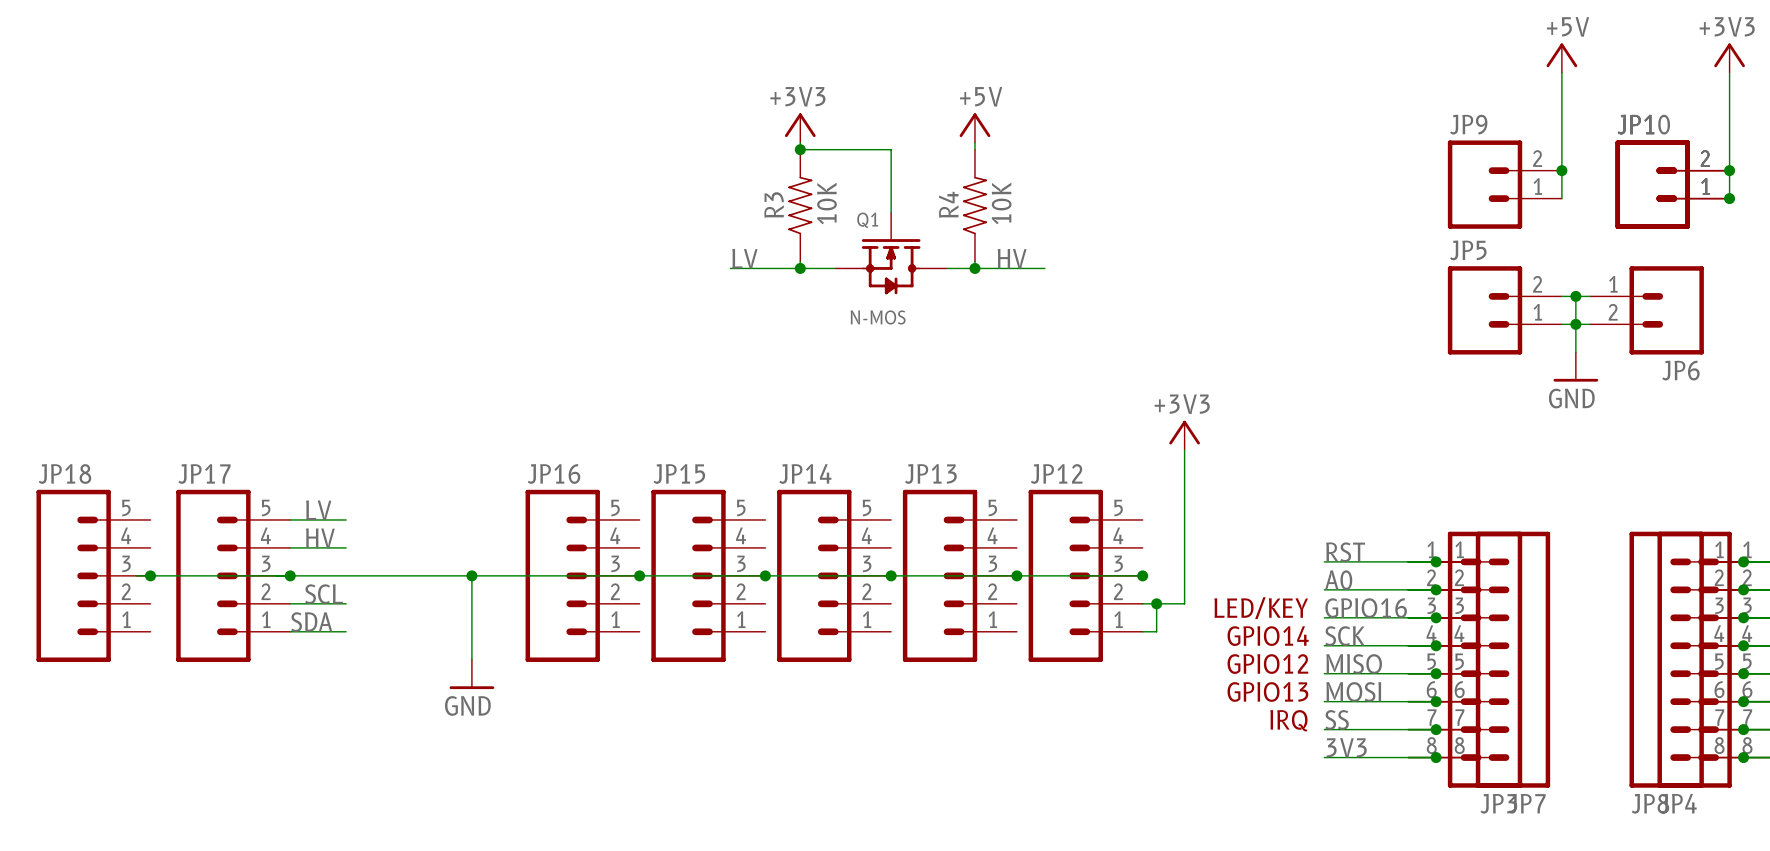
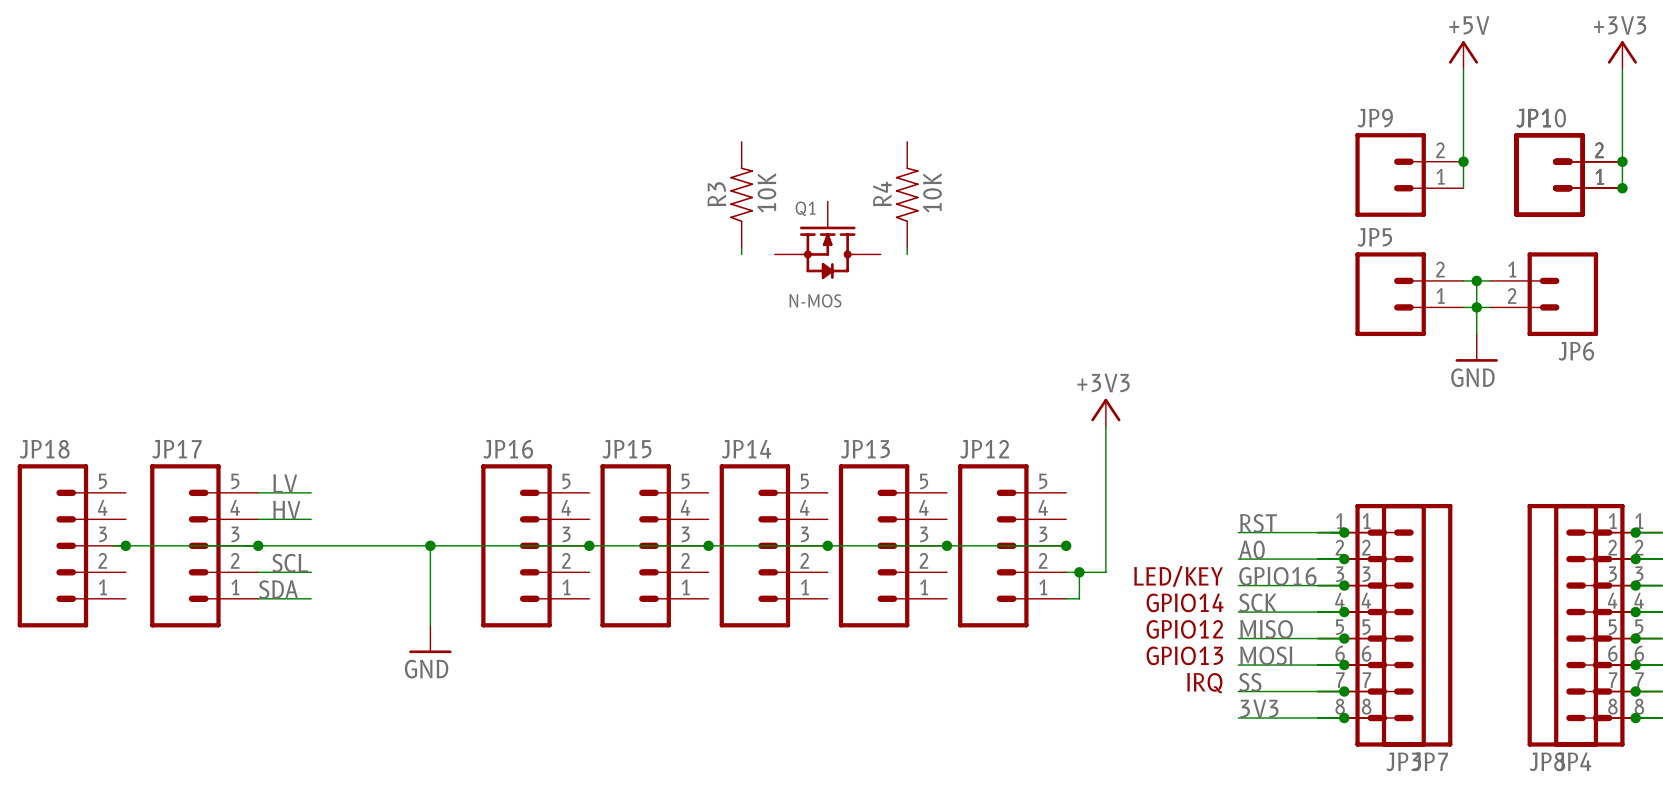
power symbol: +3V3 (800, 128) -> none
power symbol: +5V (974, 128) -> none
wire: (800, 142) (800, 149) (891, 149) (891, 212) -> none
wire: (974, 142) (974, 149) -> none
junction: (800, 149) -> none
label: LV (744, 258) -> none
label: HV (1012, 258) -> none
wire: (730, 268) (835, 268) -> none
junction: (800, 268) -> none
wire: (947, 268) (1044, 268) -> none
junction: (974, 268) -> none

